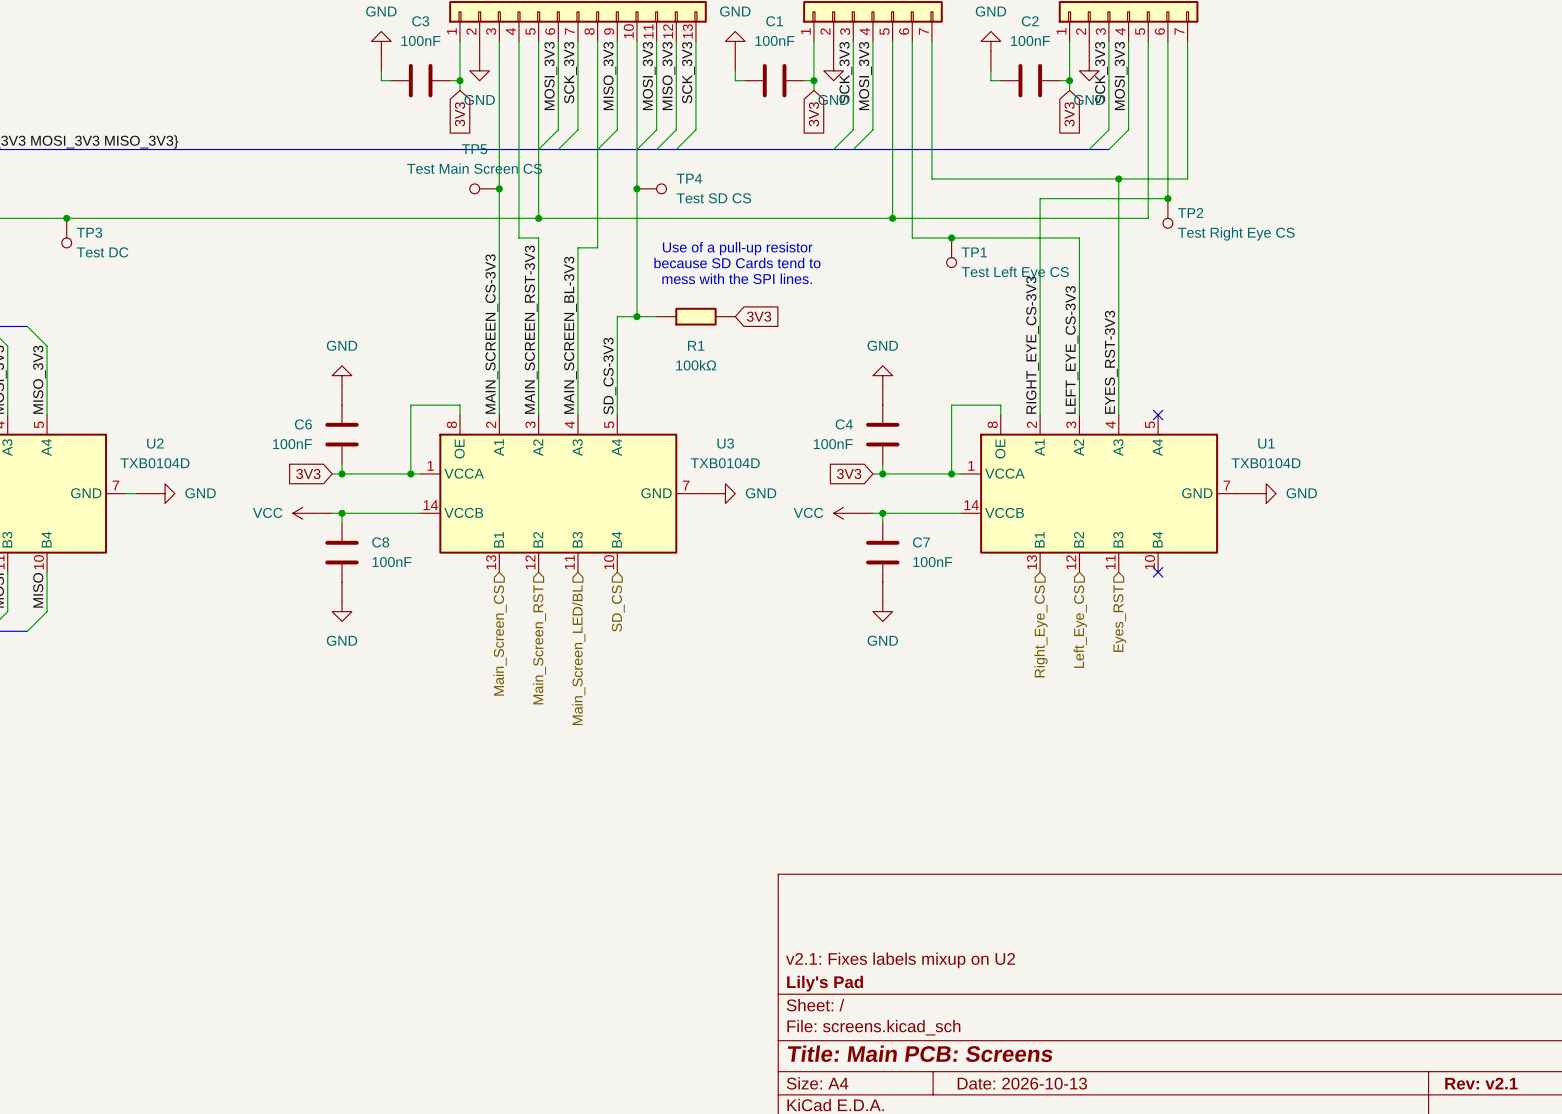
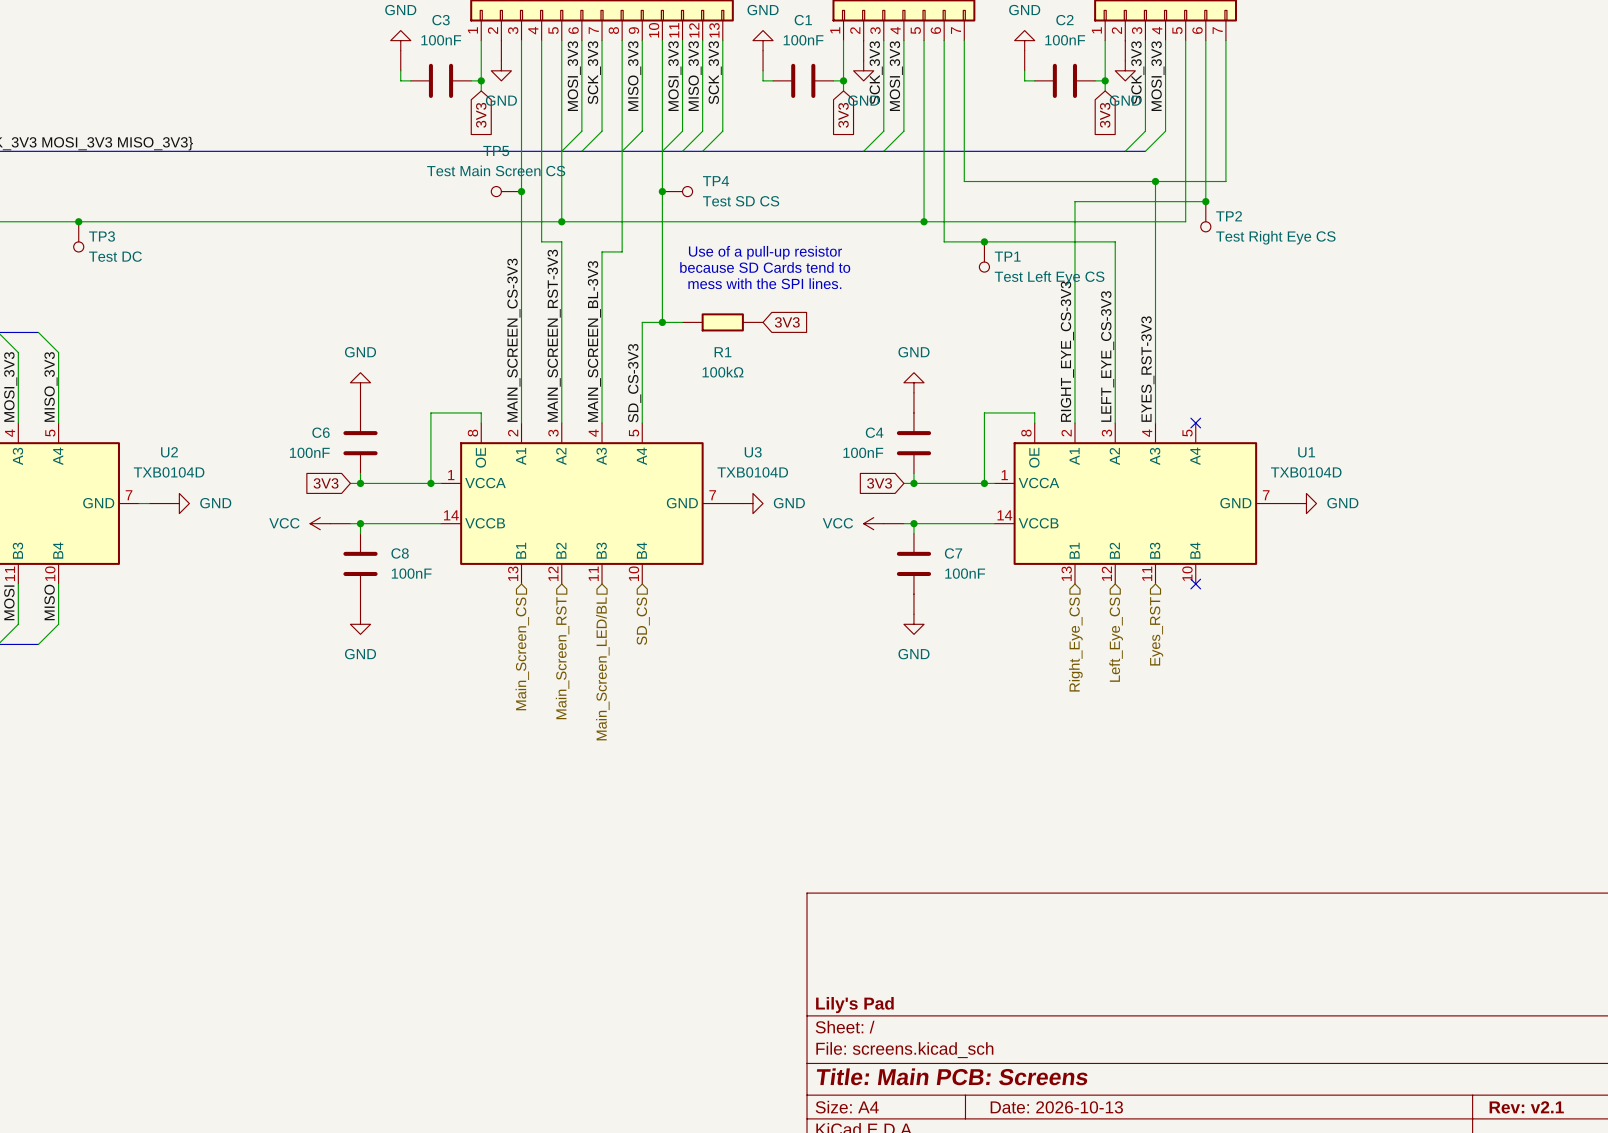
title block: v2.1: Fixes labels mixup on U2 (900, 960) -> none

